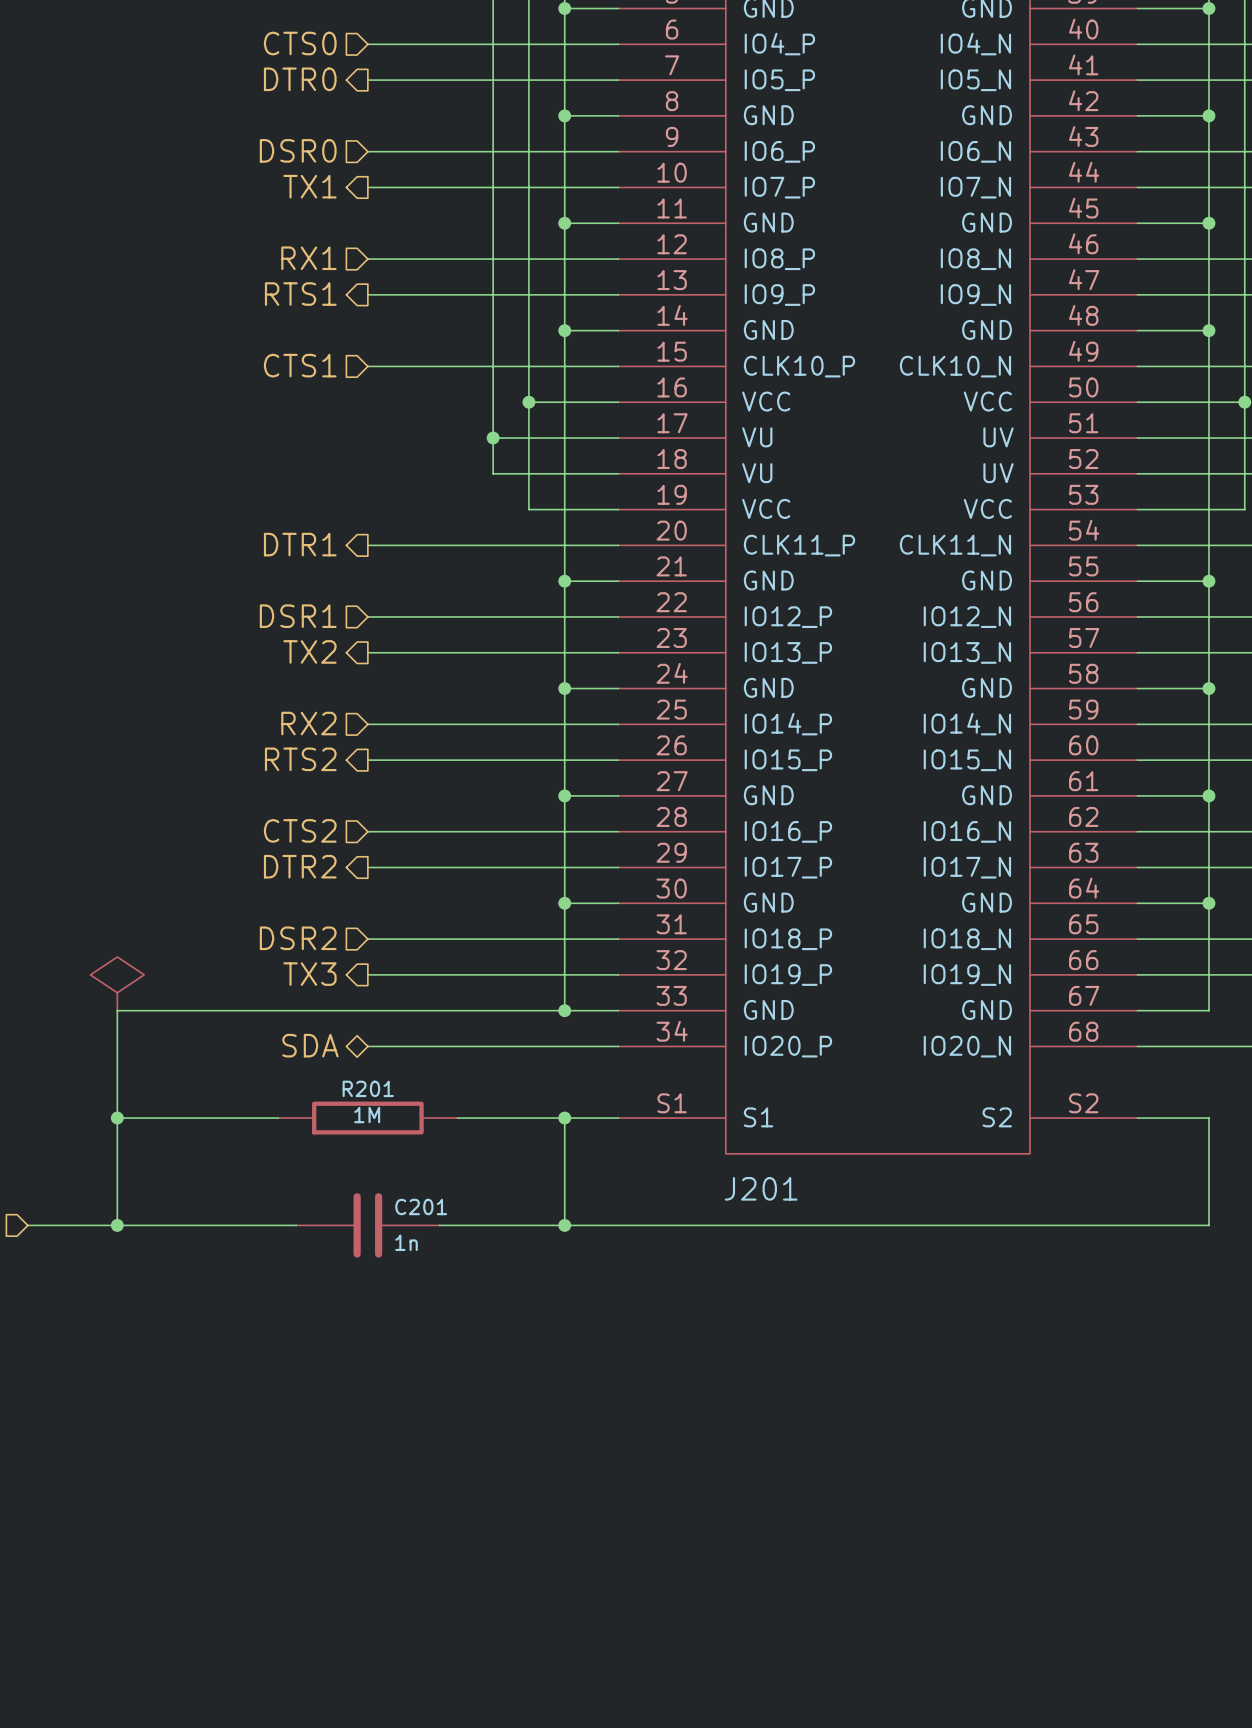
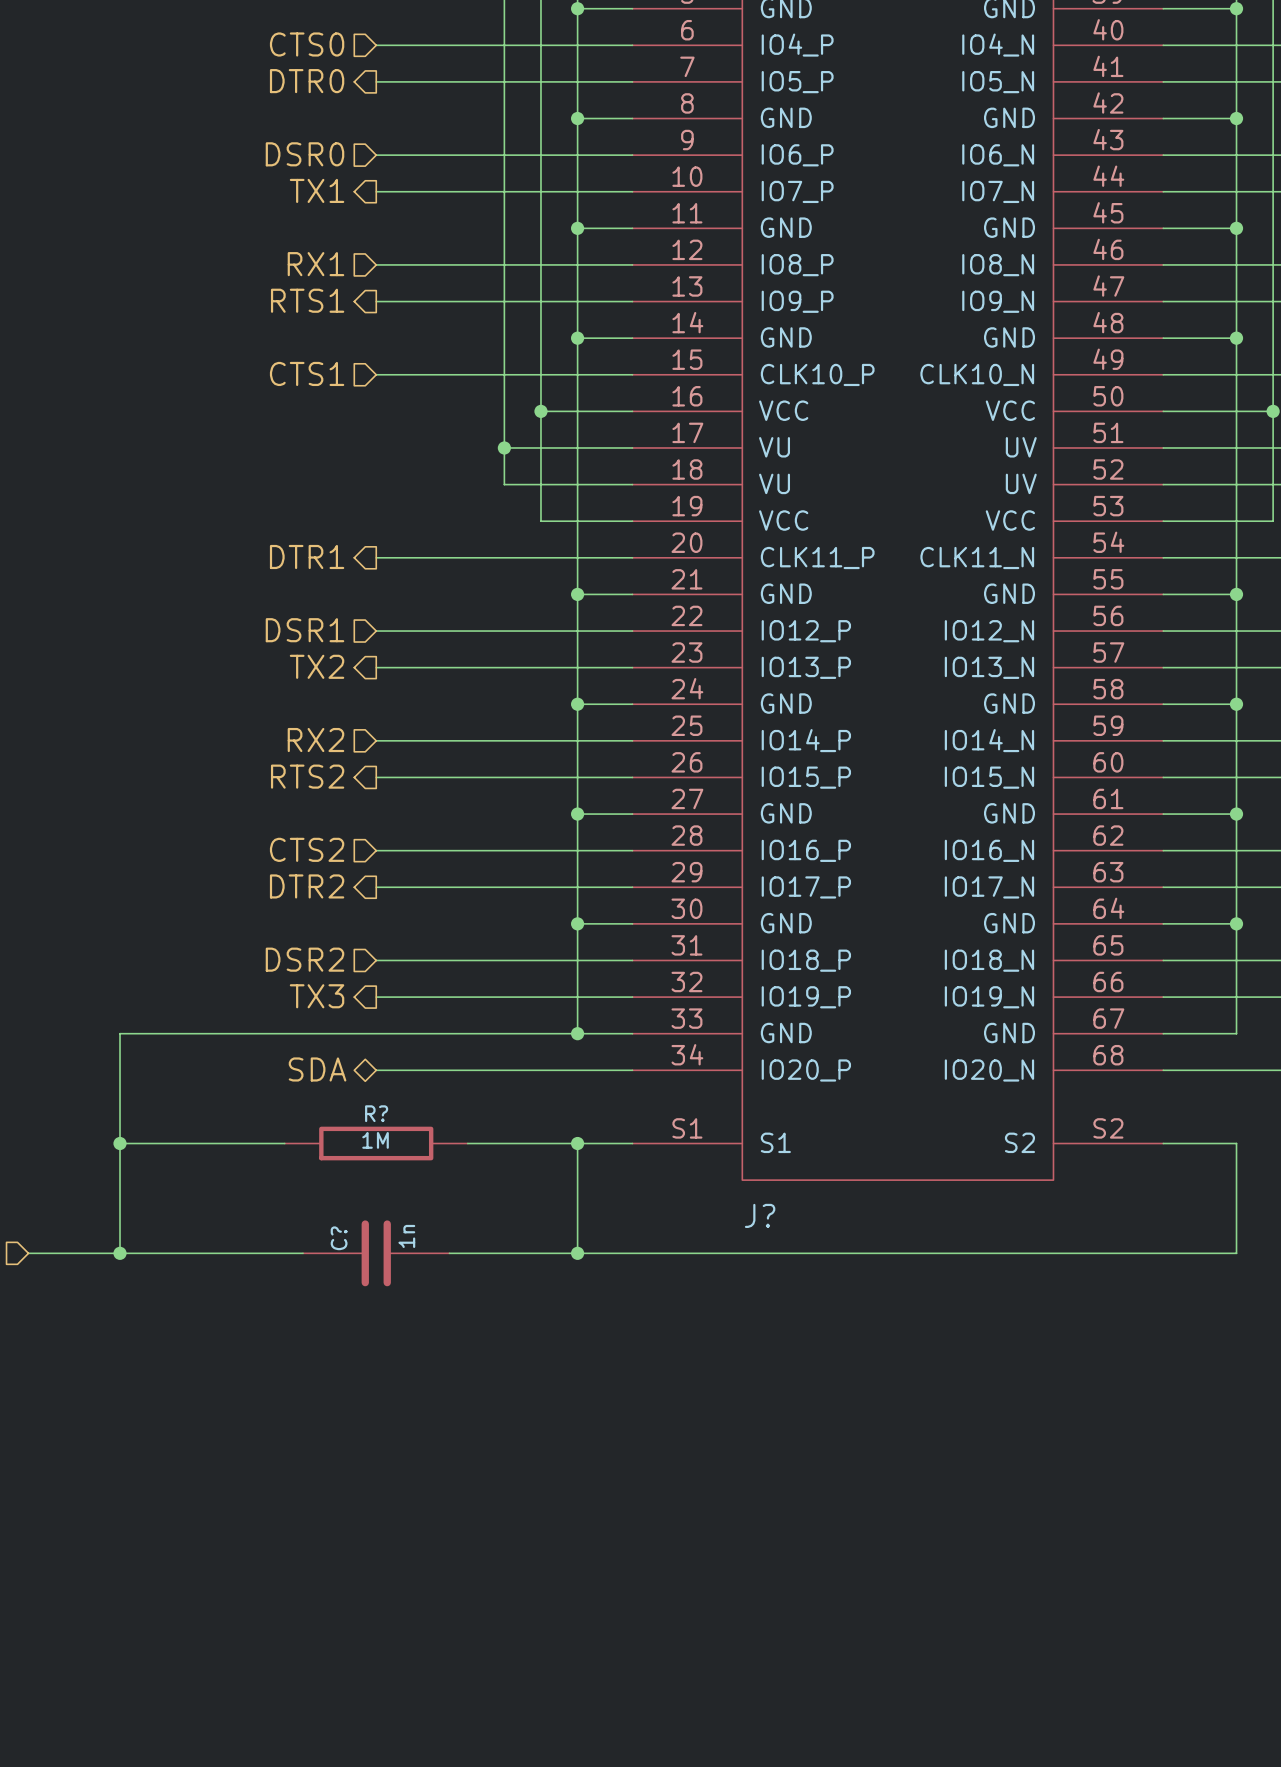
power symbol: (117, 983) -> none
R201 name: R201 (368, 1088) -> R? (376, 1113)
J201 name: J201 (761, 1188) -> J? (760, 1215)
C201 name: C201 (421, 1206) -> C? (339, 1238)
C201 value rotation: 0° (406, 1242) -> 90° counterclockwise (406, 1236)
C201 value position: 1n (406, 1242) -> 1n (406, 1236)

